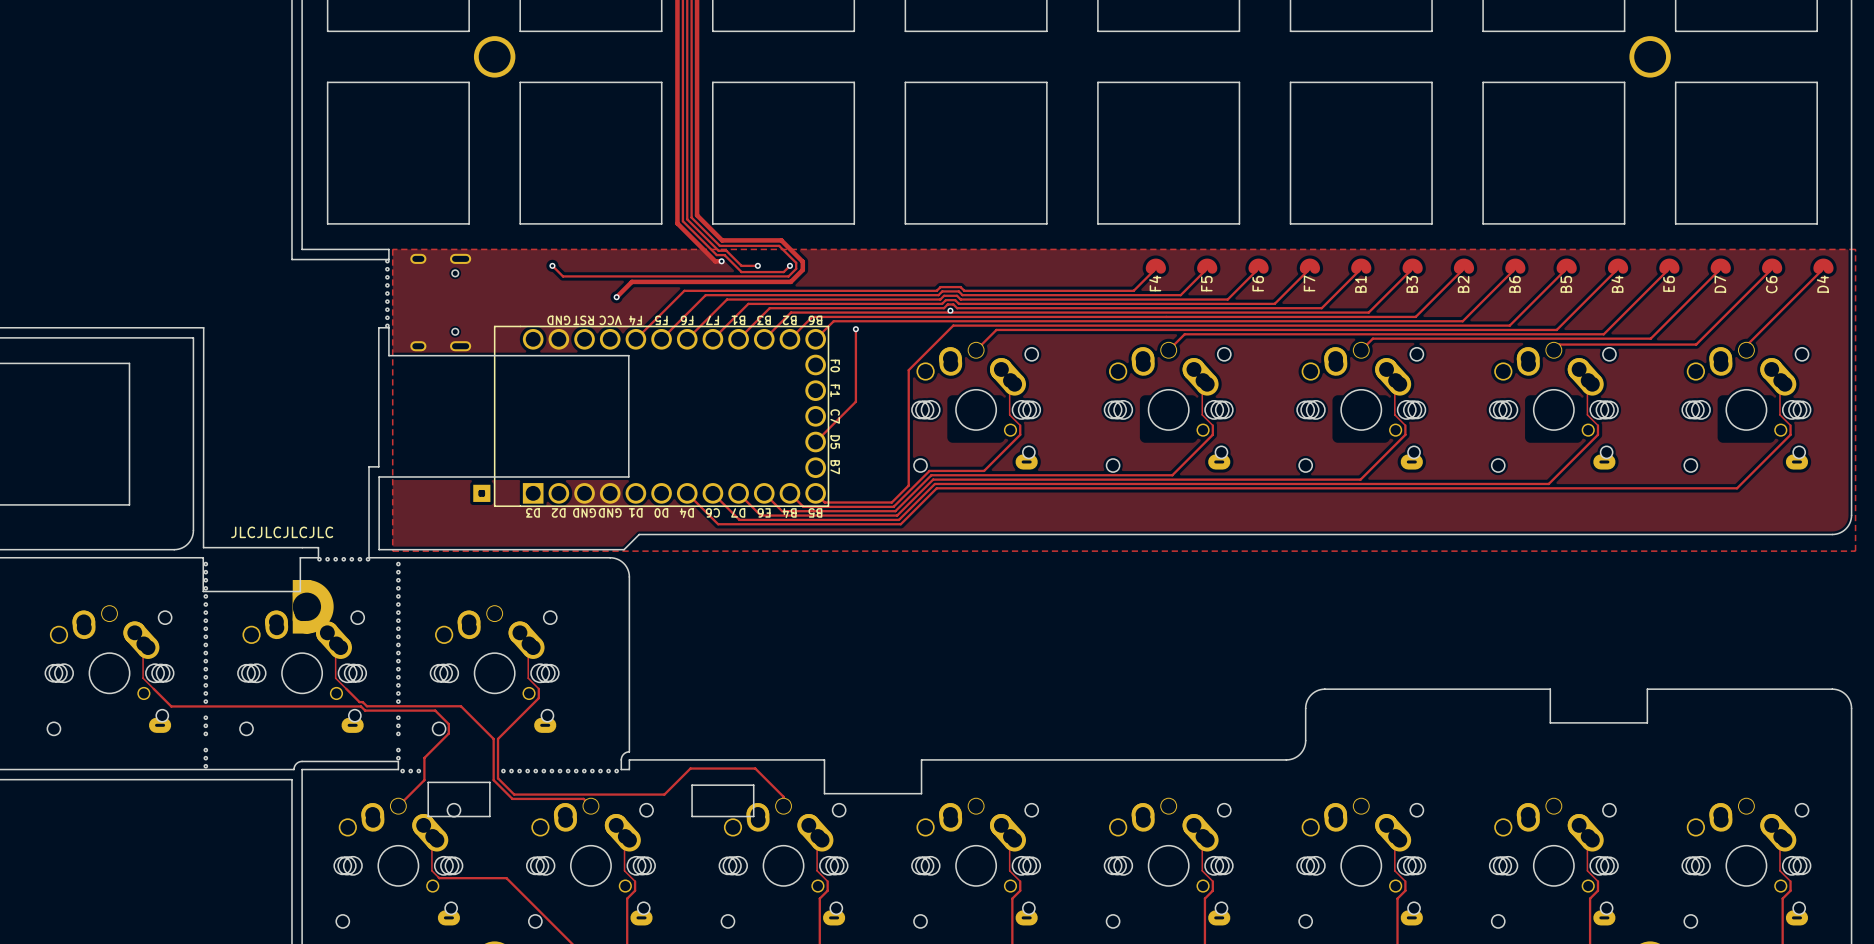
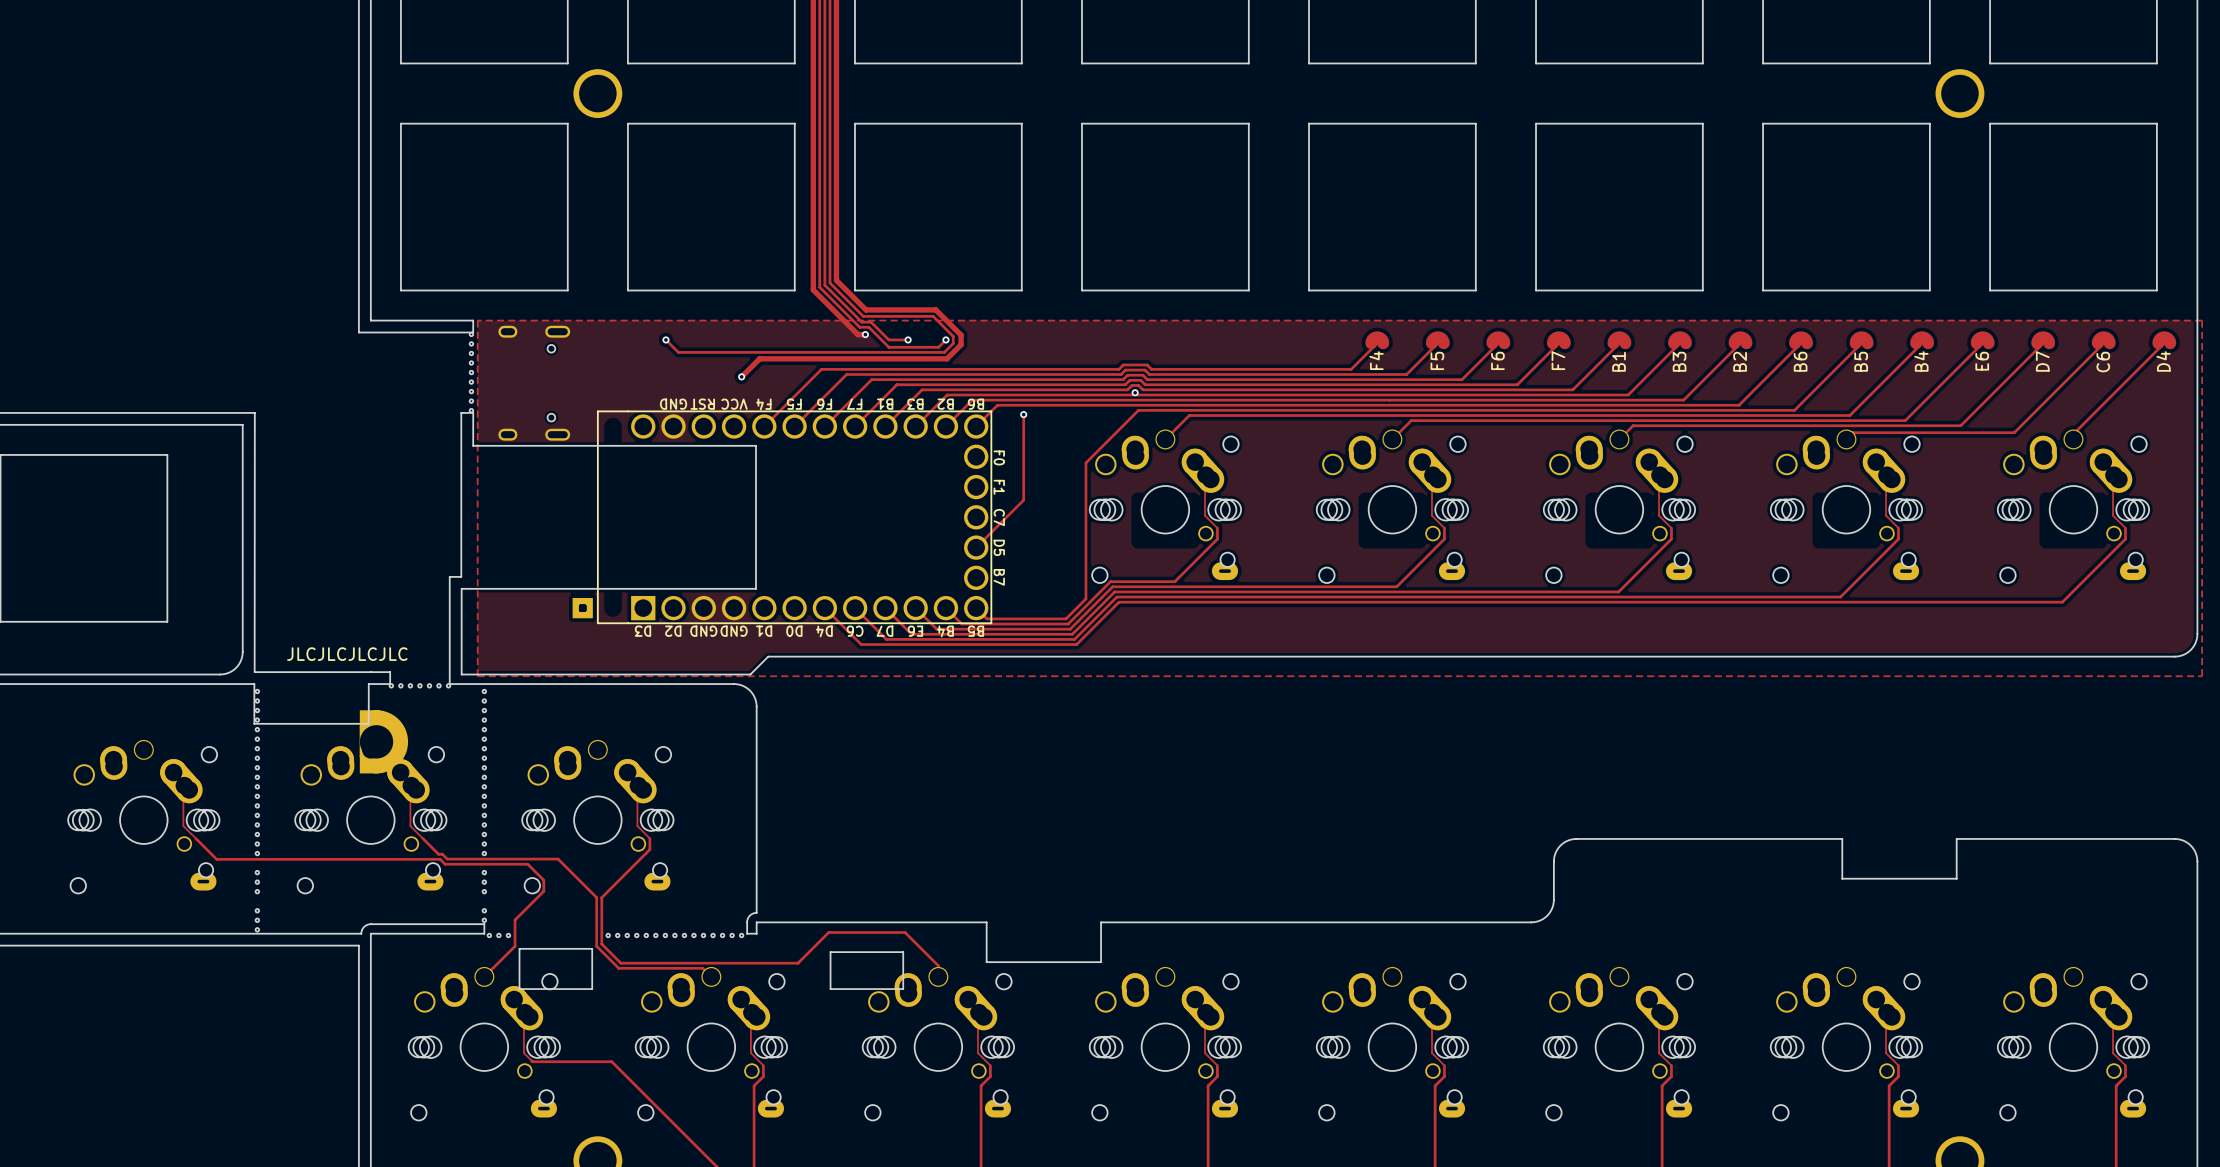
part footprint: [493, 325, 830, 507] -> [596, 410, 993, 625]

